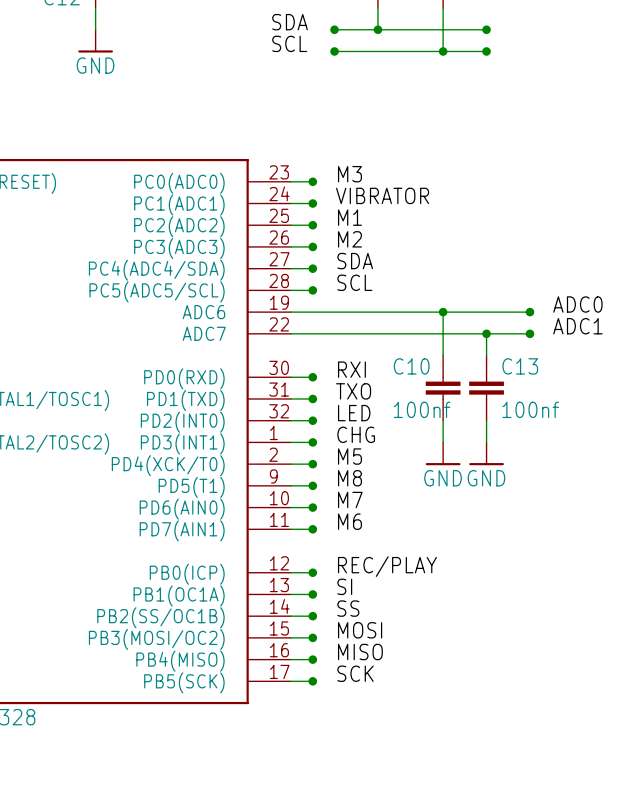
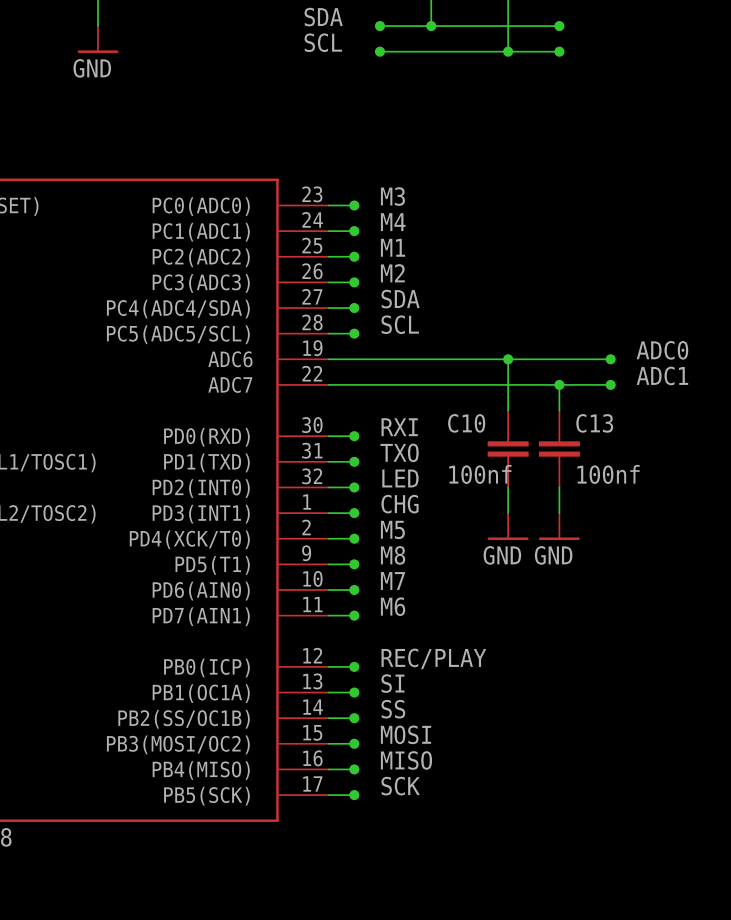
label: VIBRATOR (382, 195) -> M4 (393, 222)

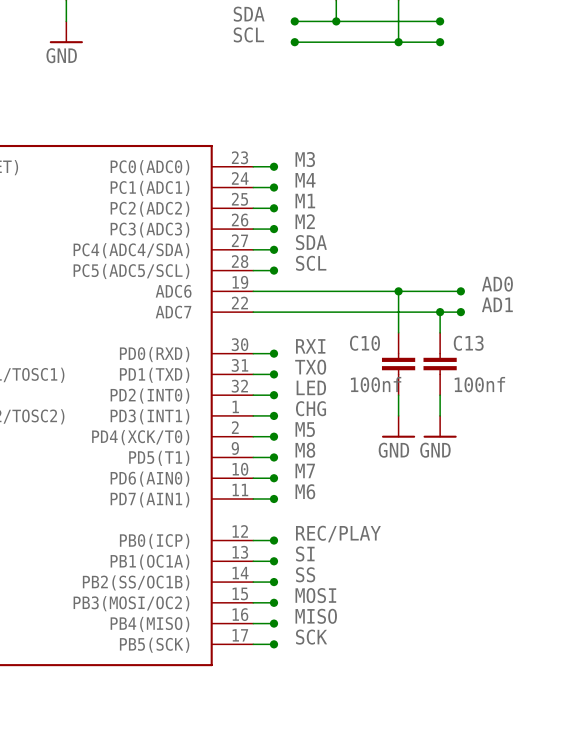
label: ADC0 (662, 350) -> AD0 (497, 284)
wire: (585, 359) (610, 359) -> none
junction: none -> (460, 291)
junction: (610, 359) -> none
label: ADC1 (662, 375) -> AD1 (497, 304)
wire: (585, 384) (610, 384) -> none
junction: none -> (460, 312)
junction: (610, 384) -> none

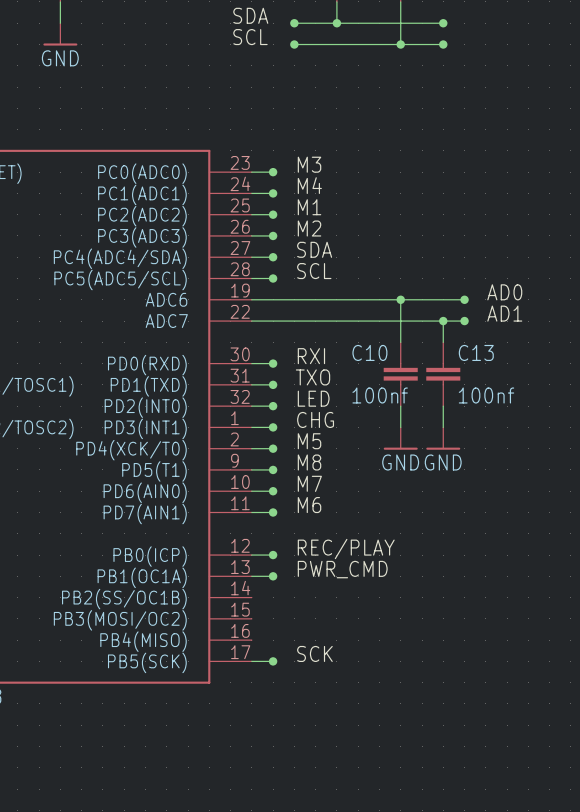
label: SI (305, 554) -> PWR_CMD (342, 569)
label: SS (305, 574) -> none
wire: (253, 582) (273, 582) -> none
junction: (273, 582) -> none
label: MOSI (315, 595) -> none
wire: (253, 602) (273, 602) -> none
junction: (273, 602) -> none
label: MISO (316, 616) -> none
wire: (253, 623) (273, 623) -> none
junction: (273, 623) -> none

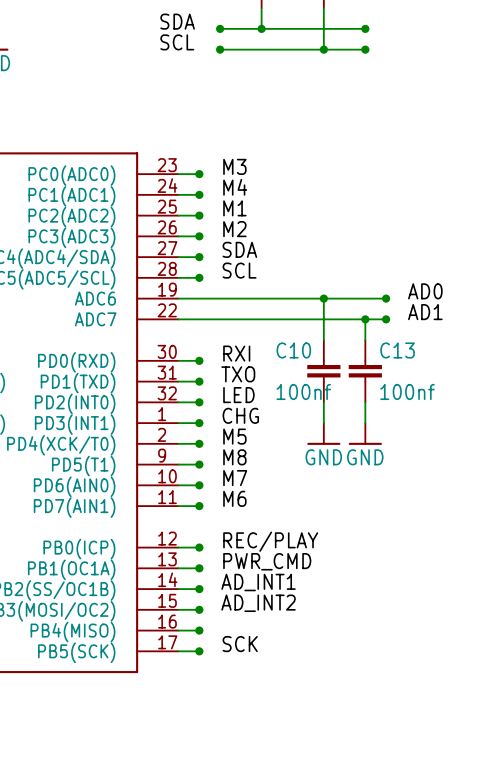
label: none -> AD_INT1 (258, 582)
wire: none -> (178, 589) (199, 589)
junction: none -> (199, 589)
label: none -> AD_INT2 (258, 603)
wire: none -> (178, 609) (199, 609)
junction: none -> (199, 609)
wire: none -> (178, 630) (199, 630)
junction: none -> (199, 630)

